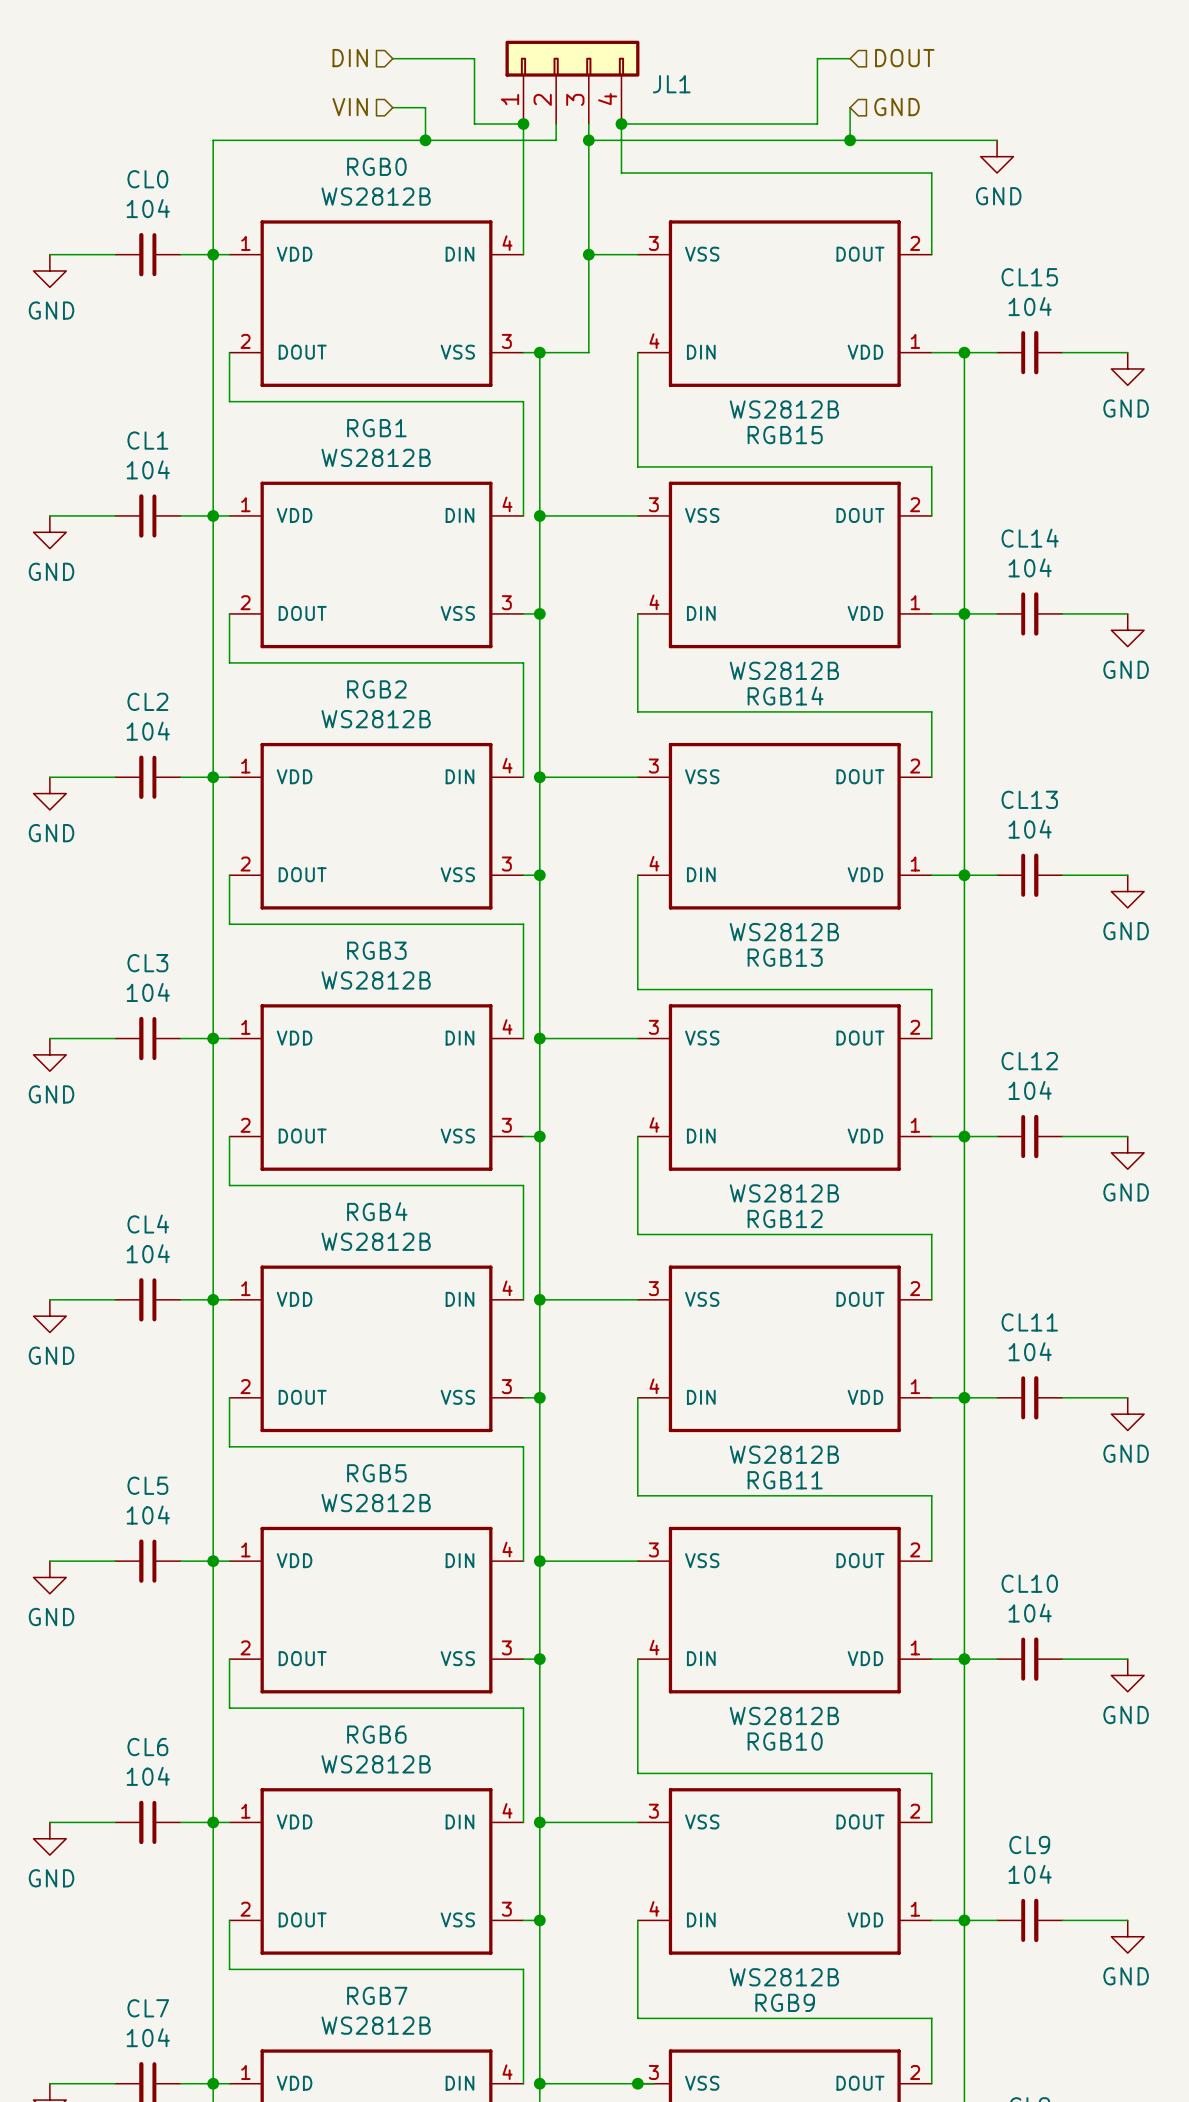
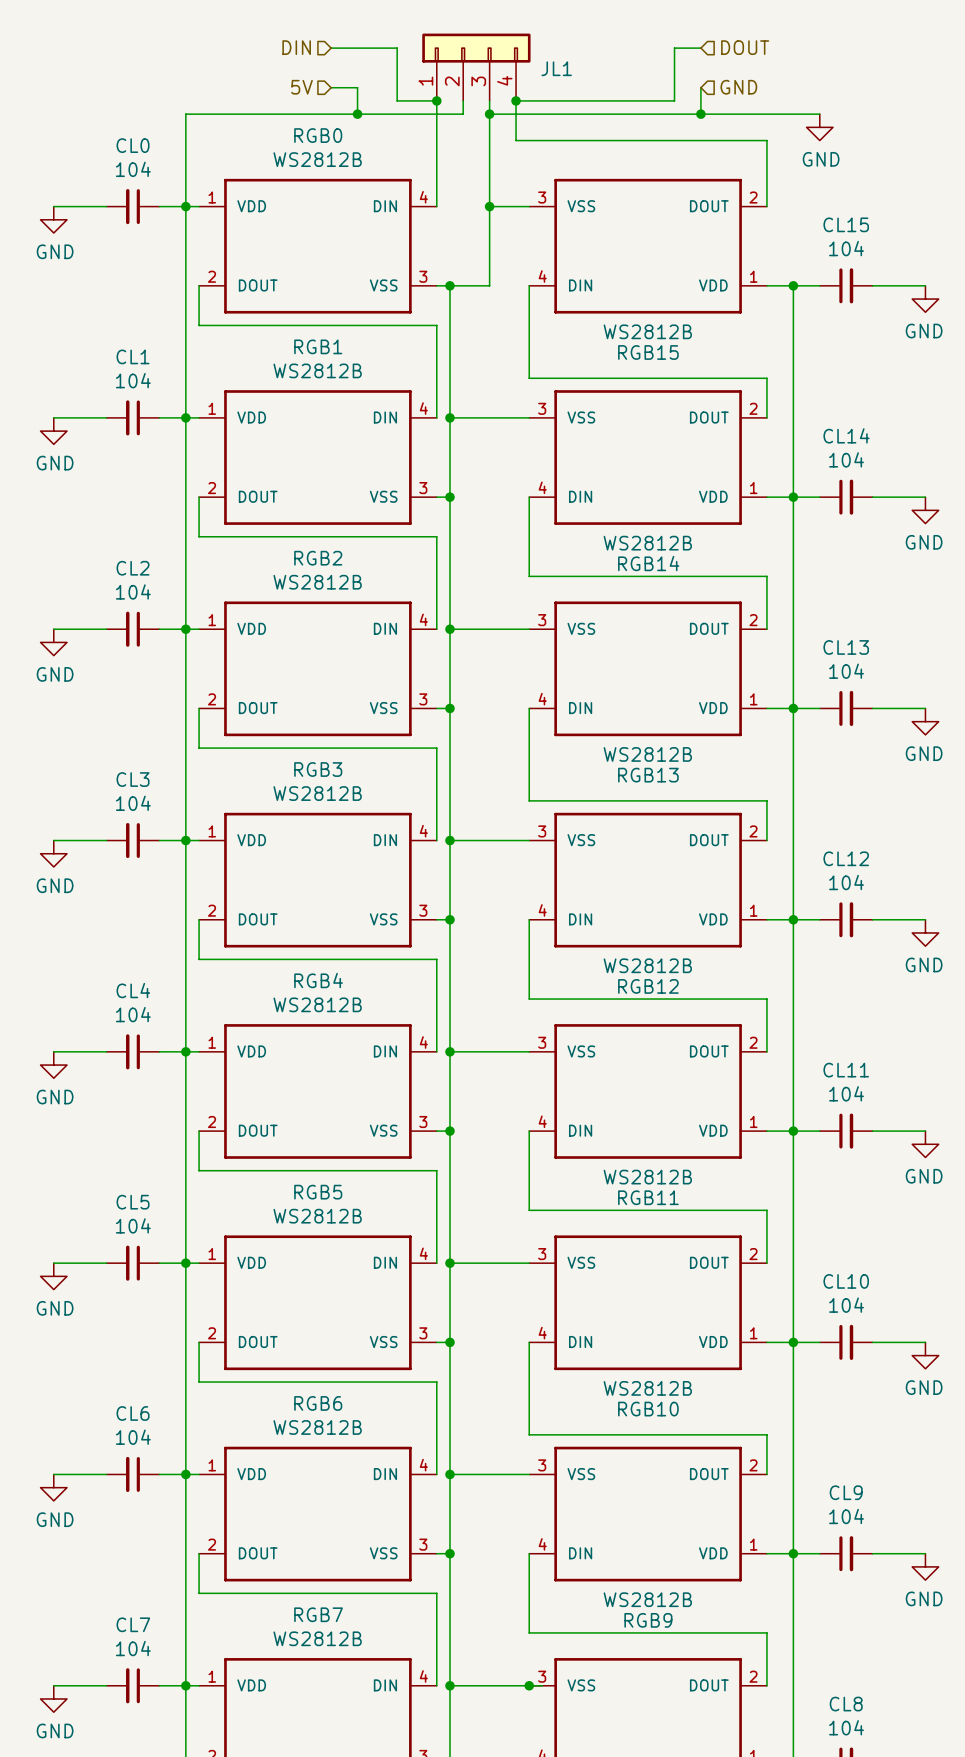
hierarchical label: VIN (350, 107) -> 5V (301, 87)

